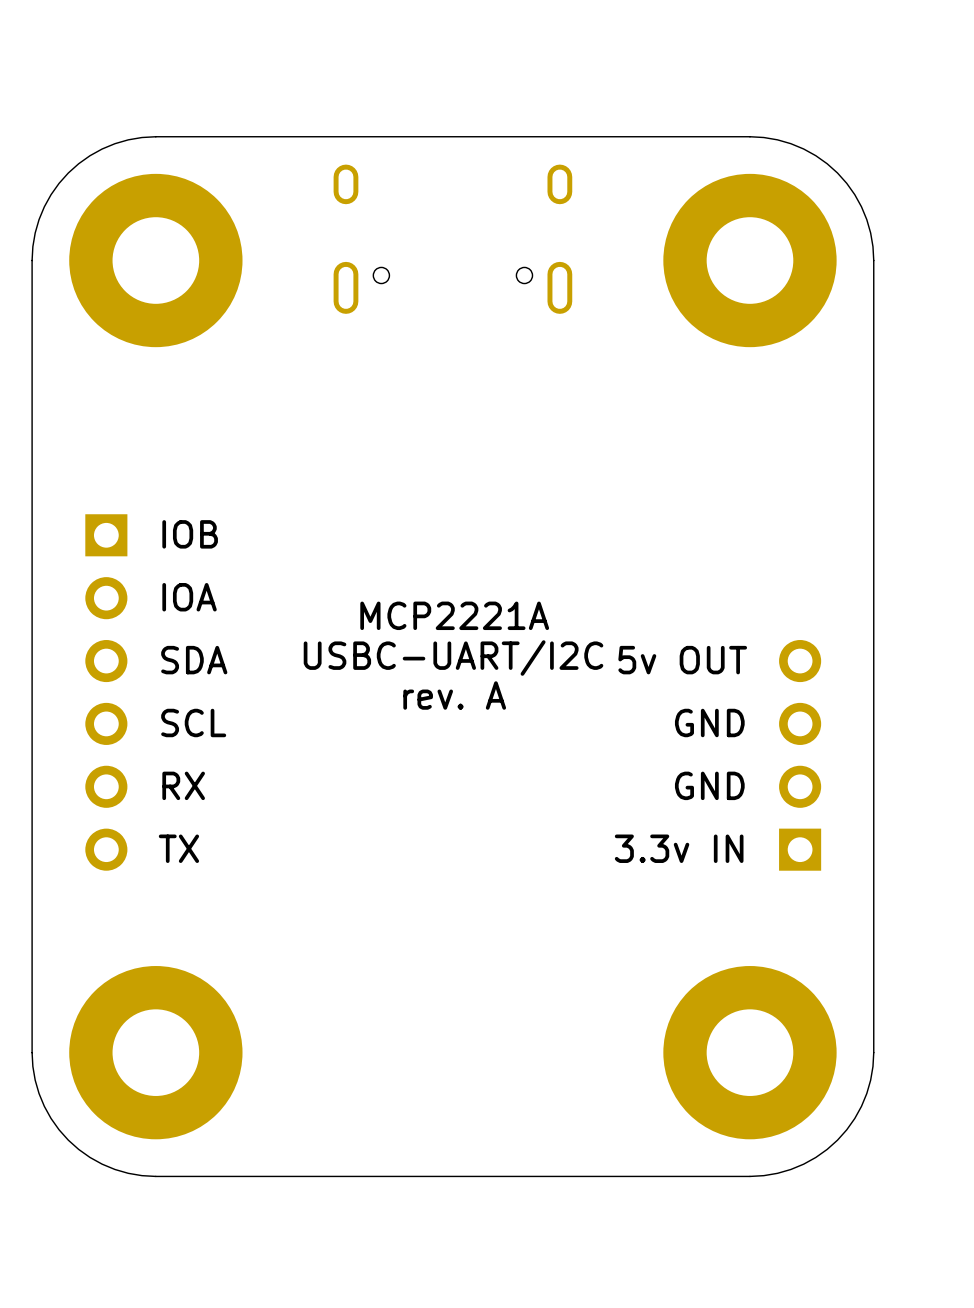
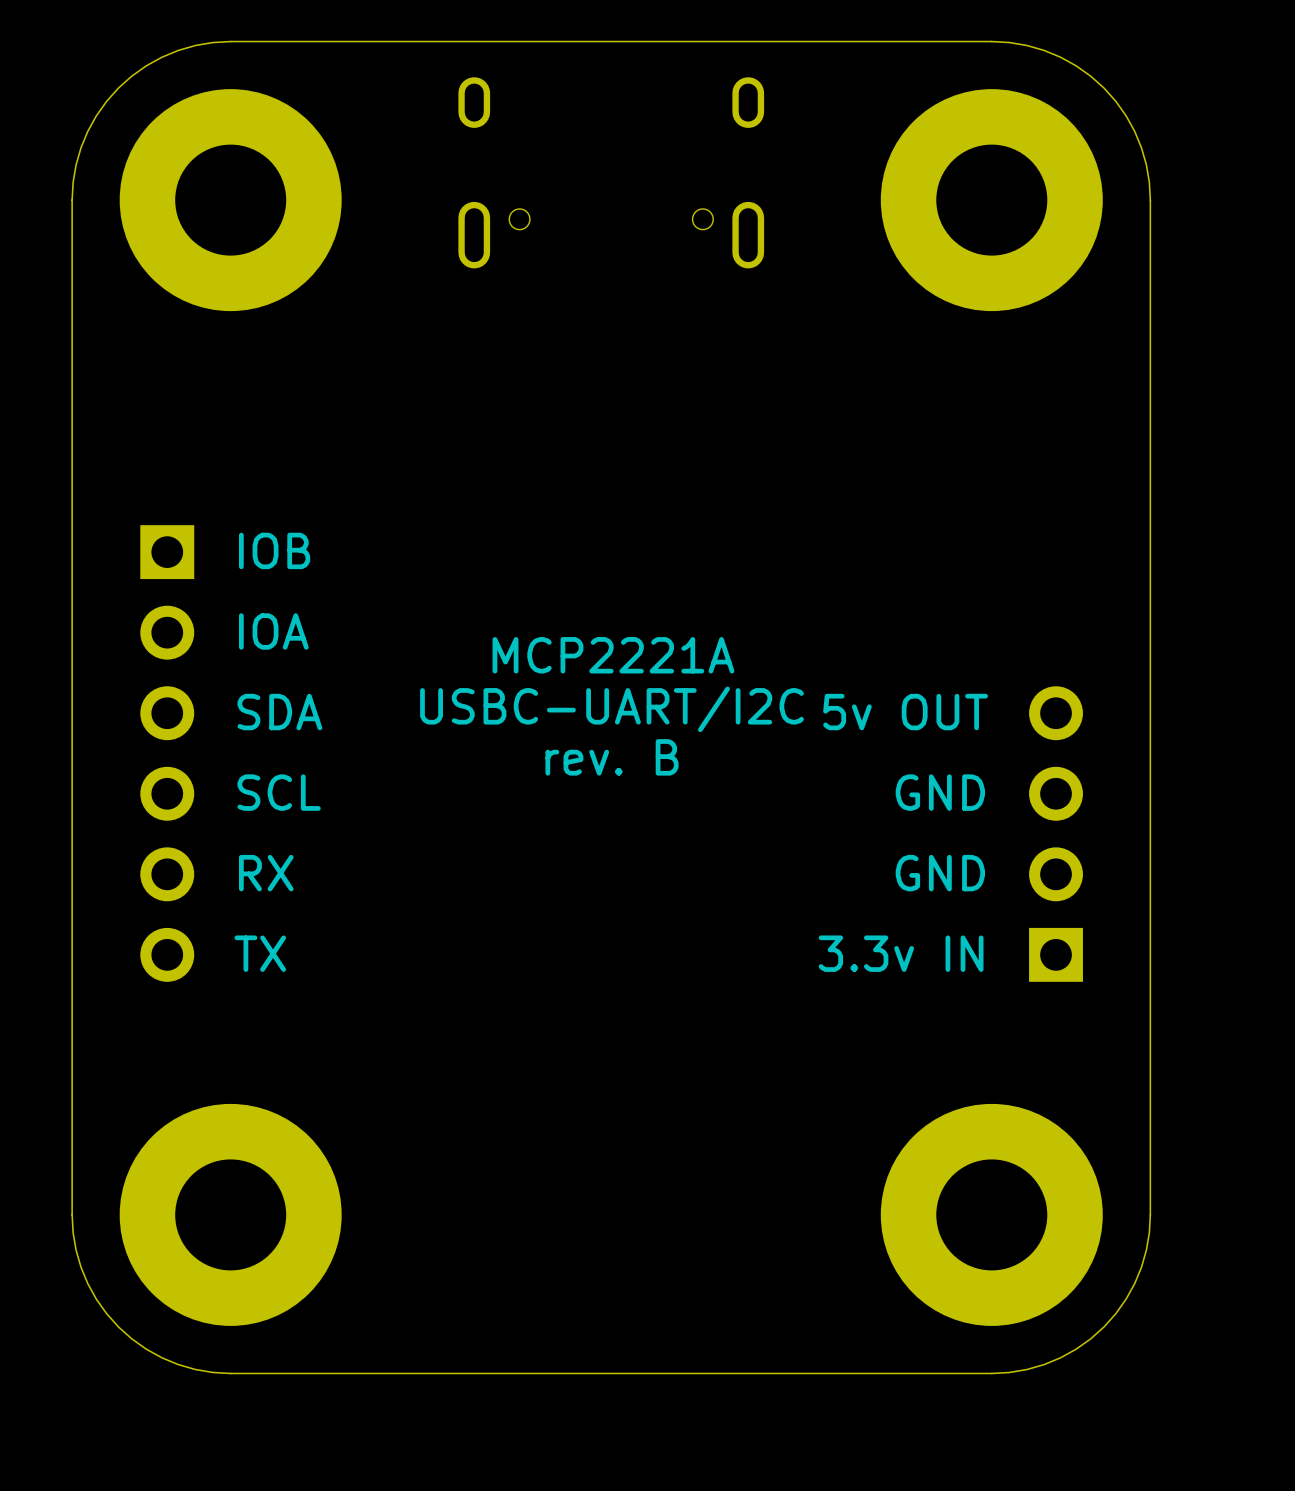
text: rev. A (454, 695) -> rev. B (612, 757)

